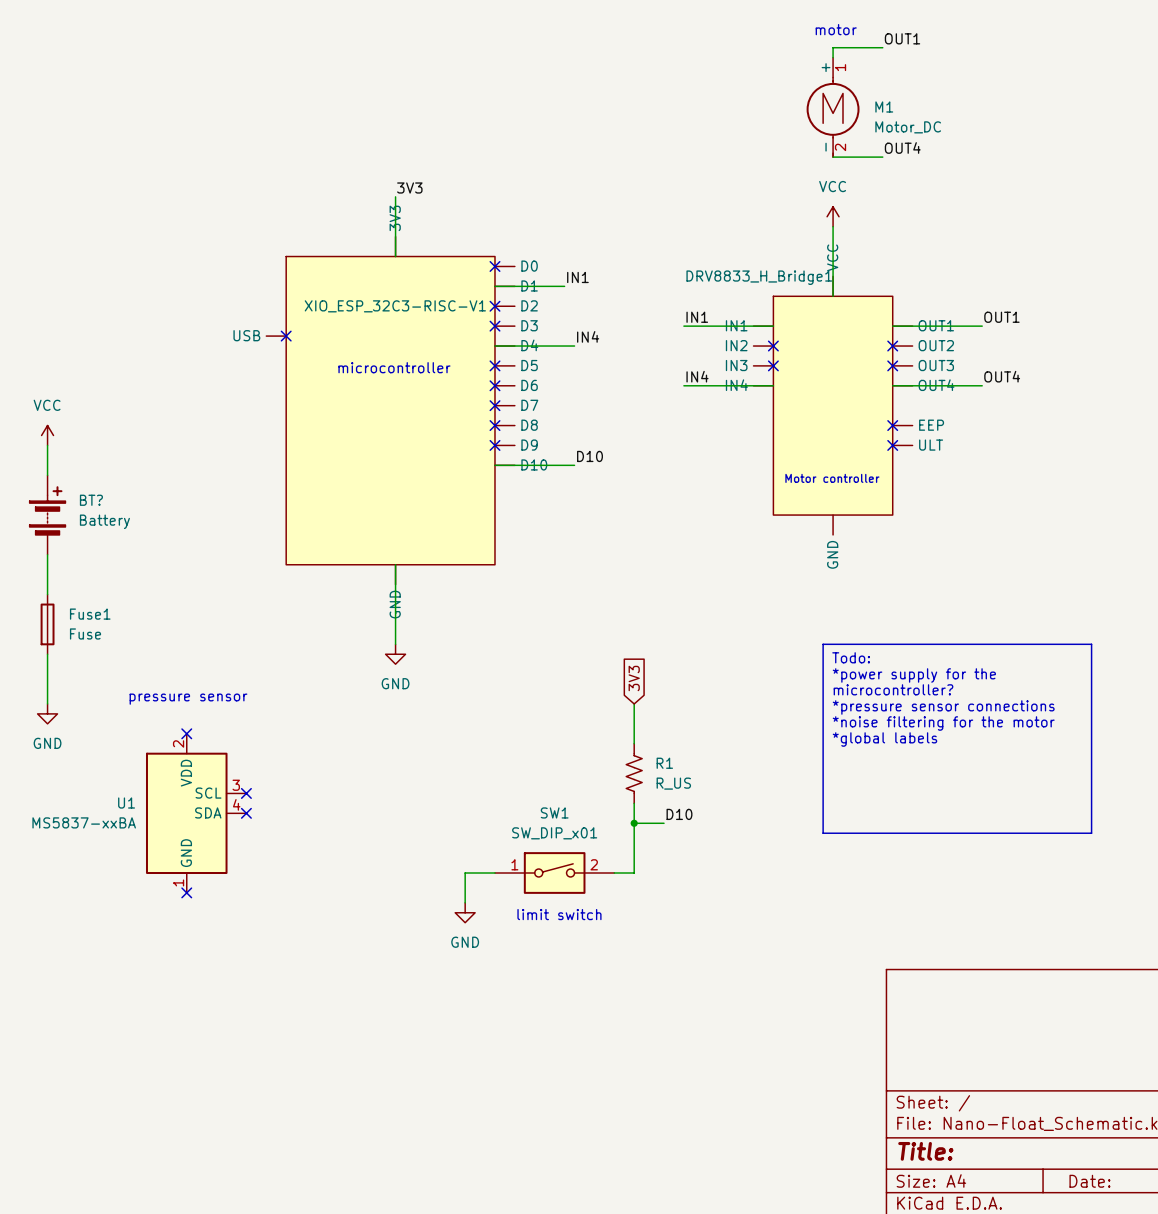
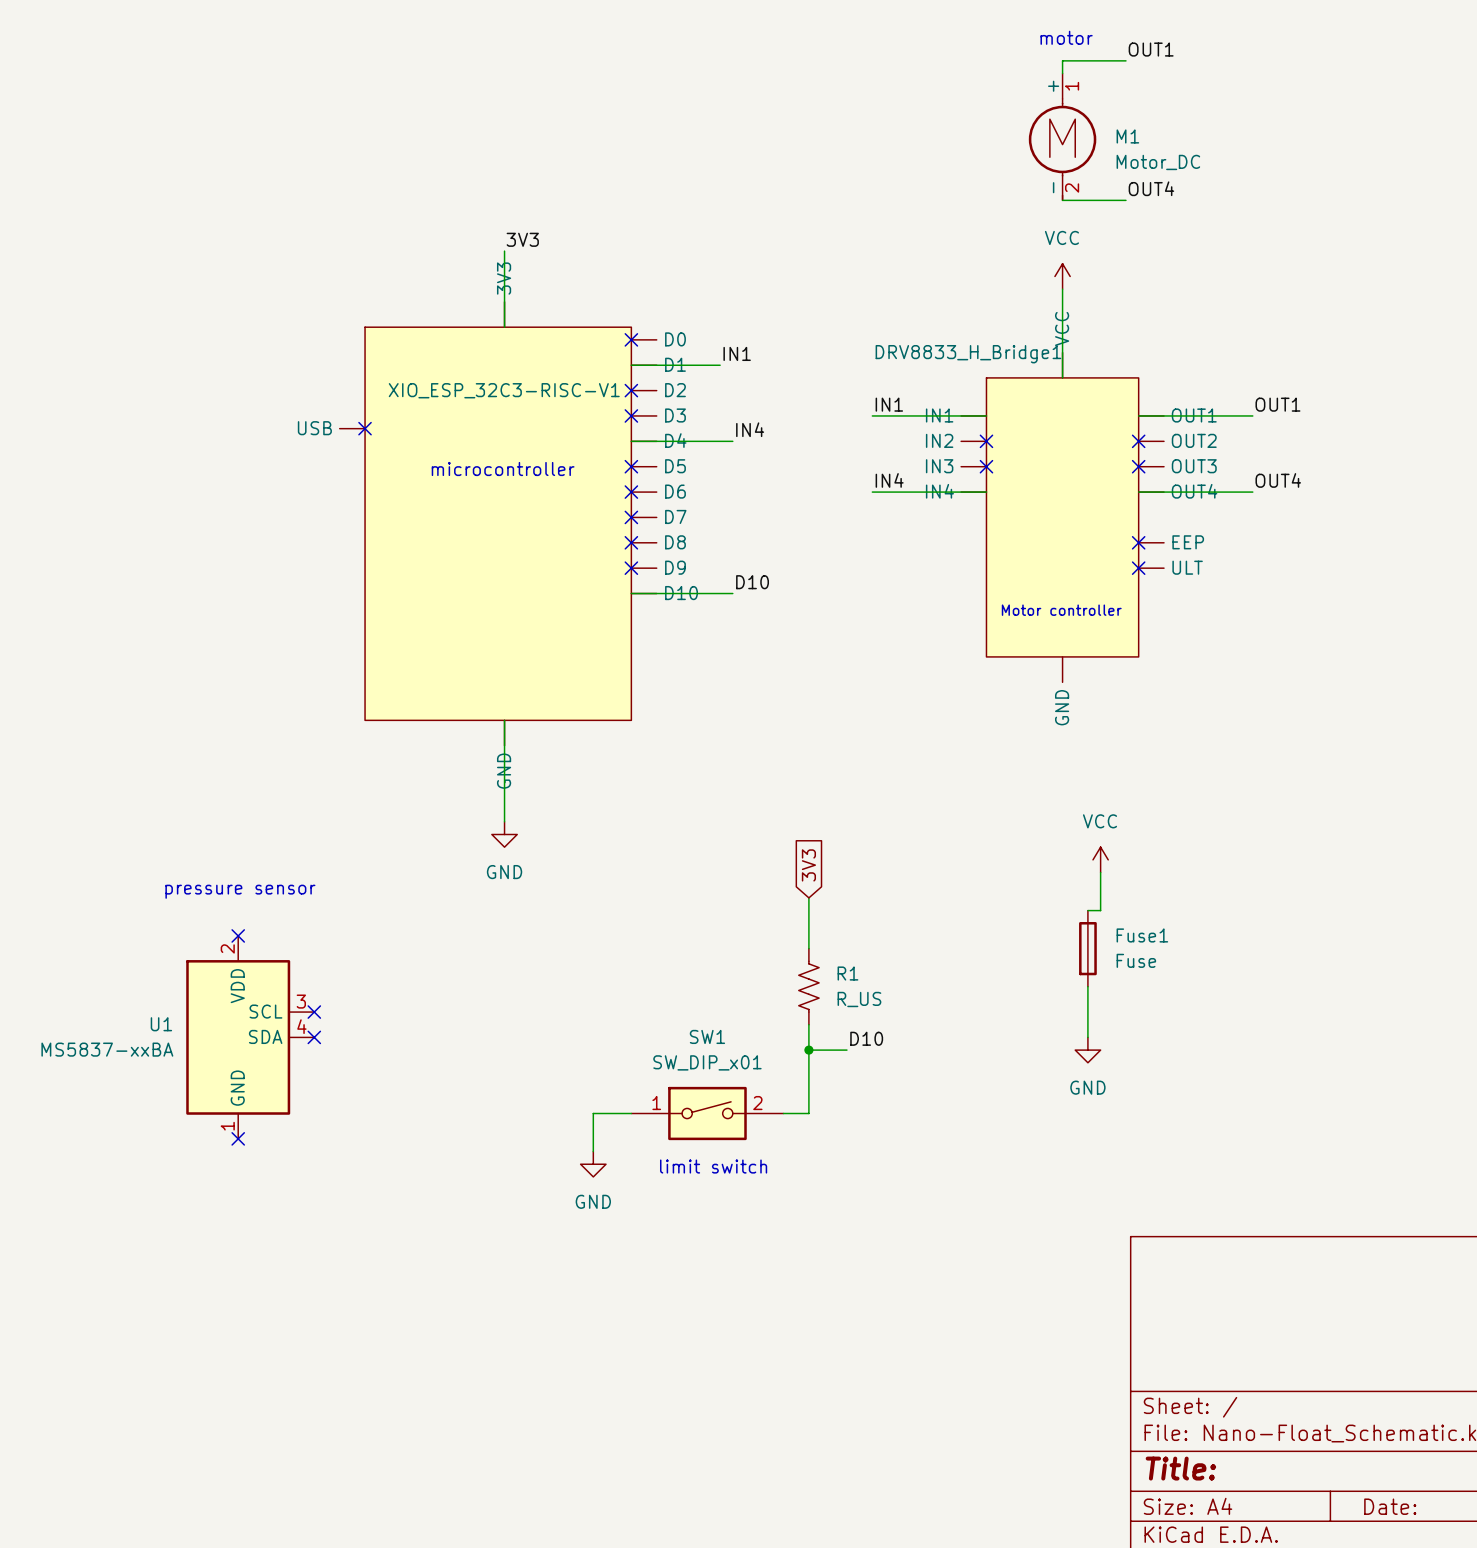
power symbol: VCC (47, 435) -> none
wire: (47, 445) (47, 475) -> none
BT?: Battery (47, 515) -> none
wire: (47, 554) (47, 594) -> none
Fuse1 position: (47, 624) -> (1087, 948)
line: (823, 644) (1091, 644) (1091, 833) (823, 833) (823, 644) -> none
wire: (47, 654) (47, 703) -> none
text: Todo: (851, 657) -> none
power symbol: none -> VCC (1100, 859)
text: *power supply for the (914, 675) -> none
wire: none -> (1100, 872) (1100, 910) (1087, 910)
text: microcontroller? (893, 689) -> none
text: *pressure sensor connections (943, 707) -> none
power symbol: GND (47, 713) -> none
text: *noise filtering for the motor (943, 723) -> none
text: *global labels (884, 739) -> none
wire: none -> (1087, 986) (1087, 1037)
power symbol: none -> GND (1087, 1050)

